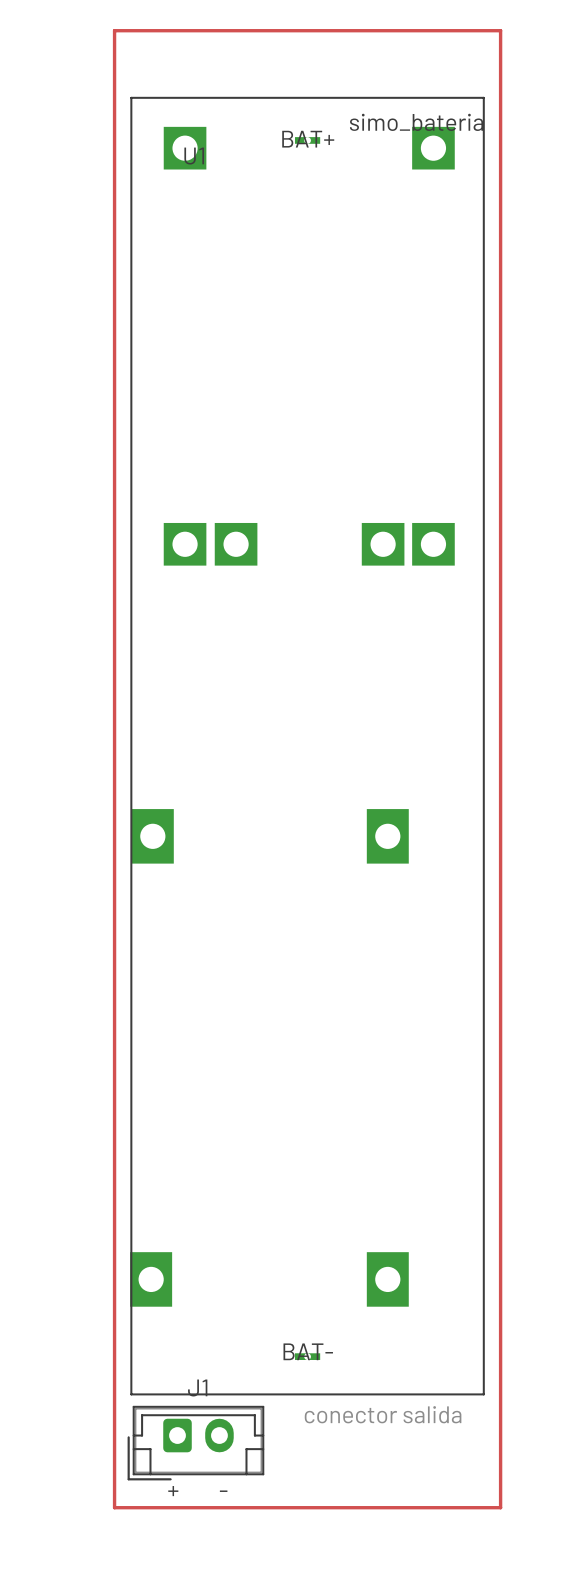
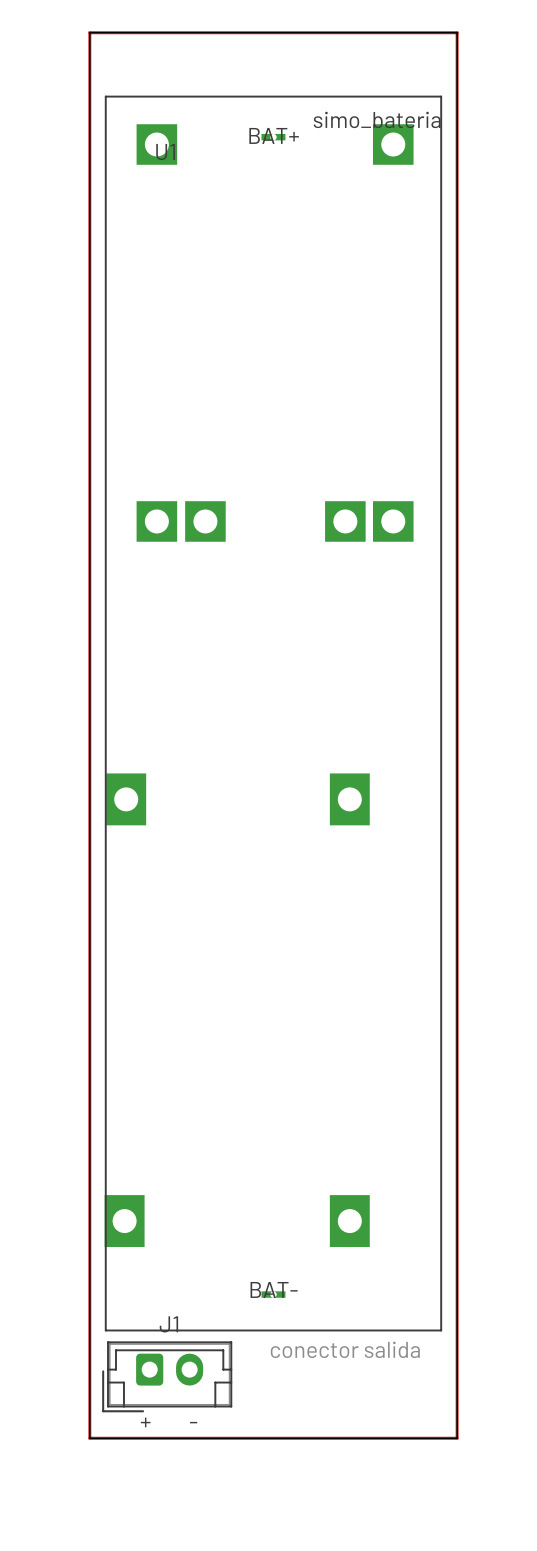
board edge: none -> (89, 32) (457, 32) (457, 1438) (89, 1438) (89, 32)

